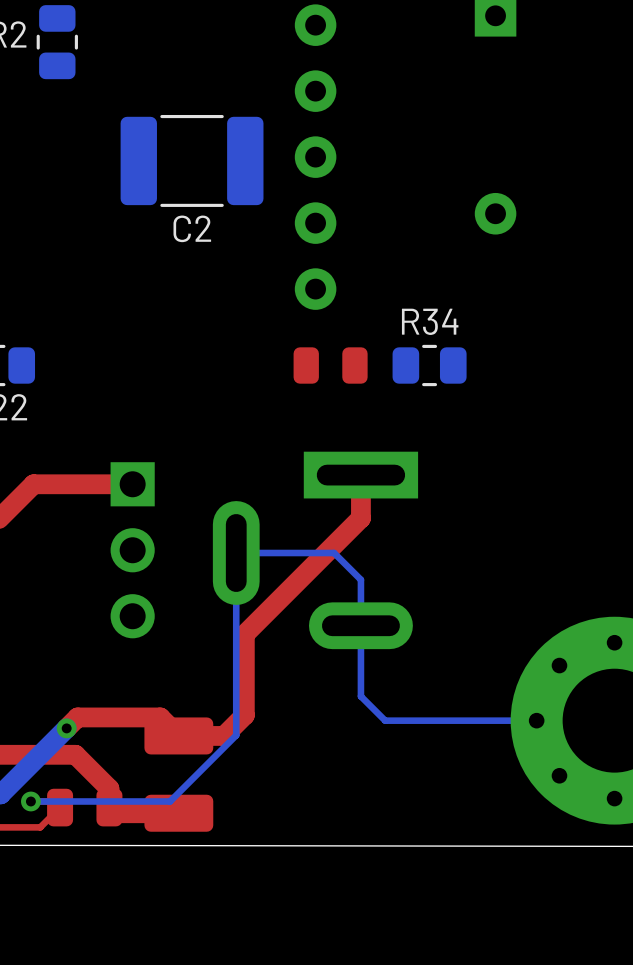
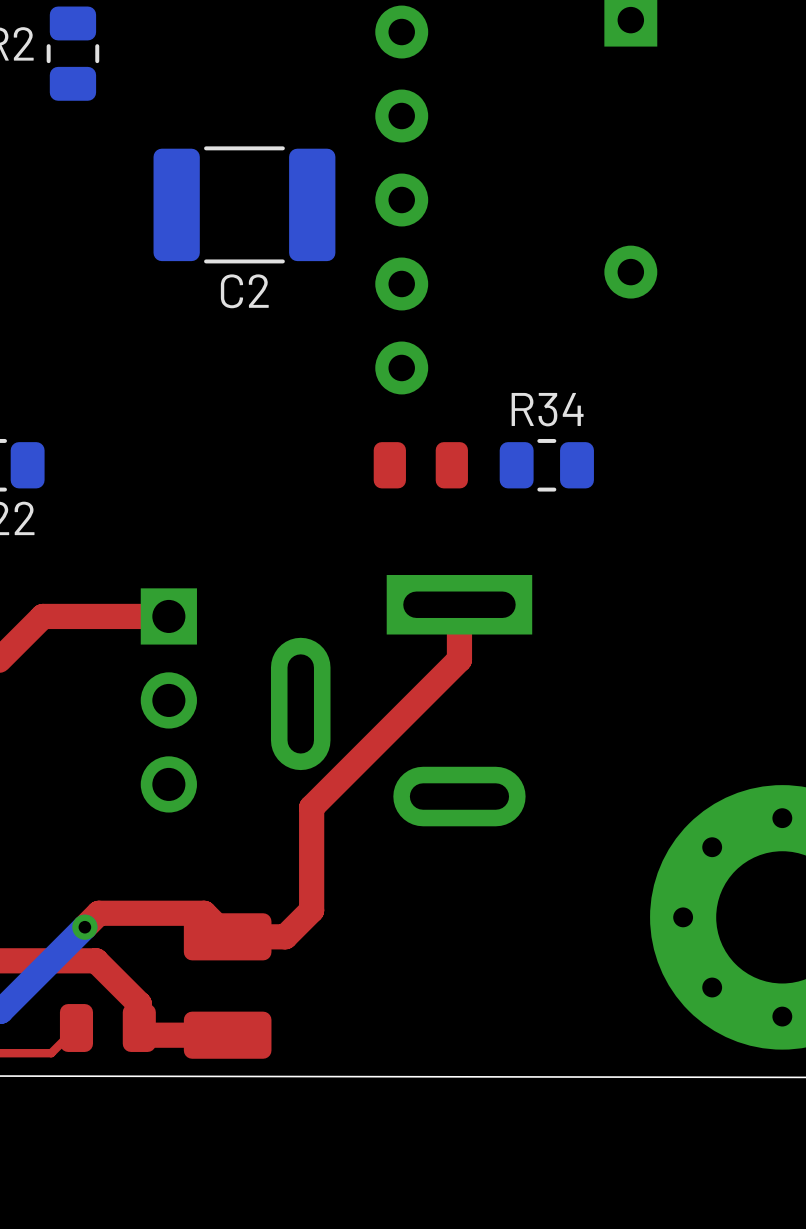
bottom track: (536, 720) (385, 720) (360, 696) (360, 579) (334, 553) (236, 553) (236, 735) (170, 801) (30, 801) -> none
via: (30, 801) -> none

